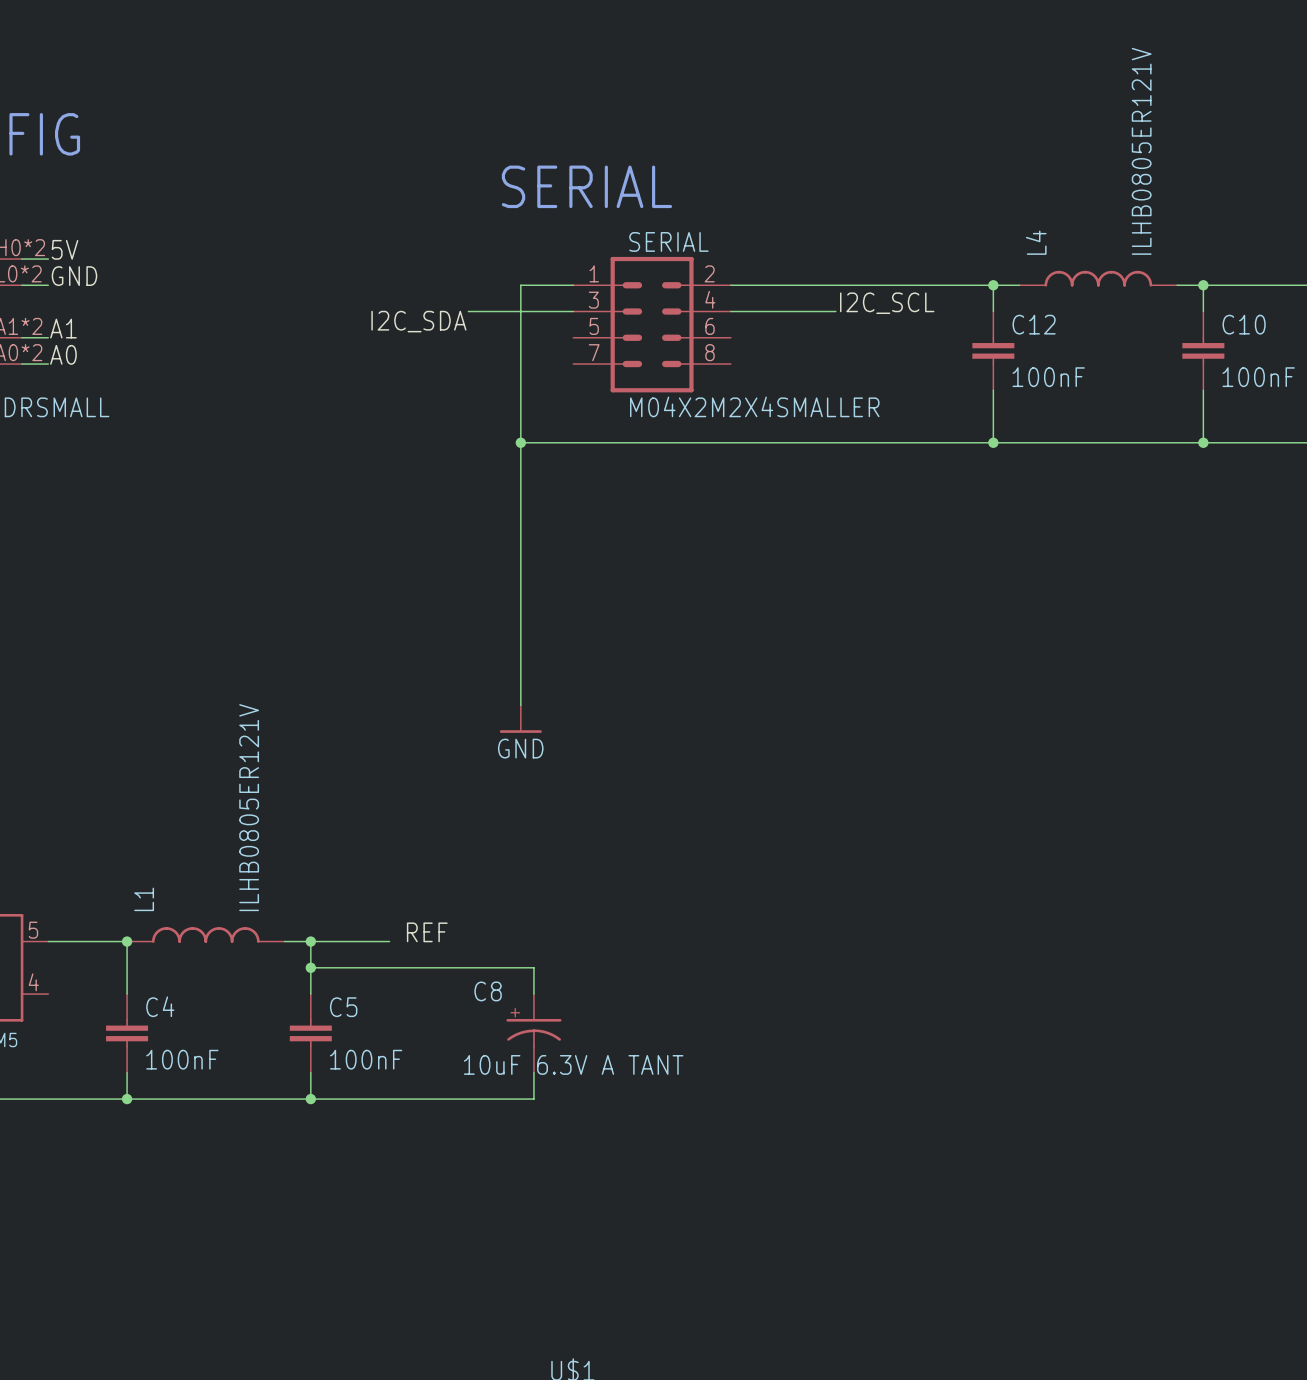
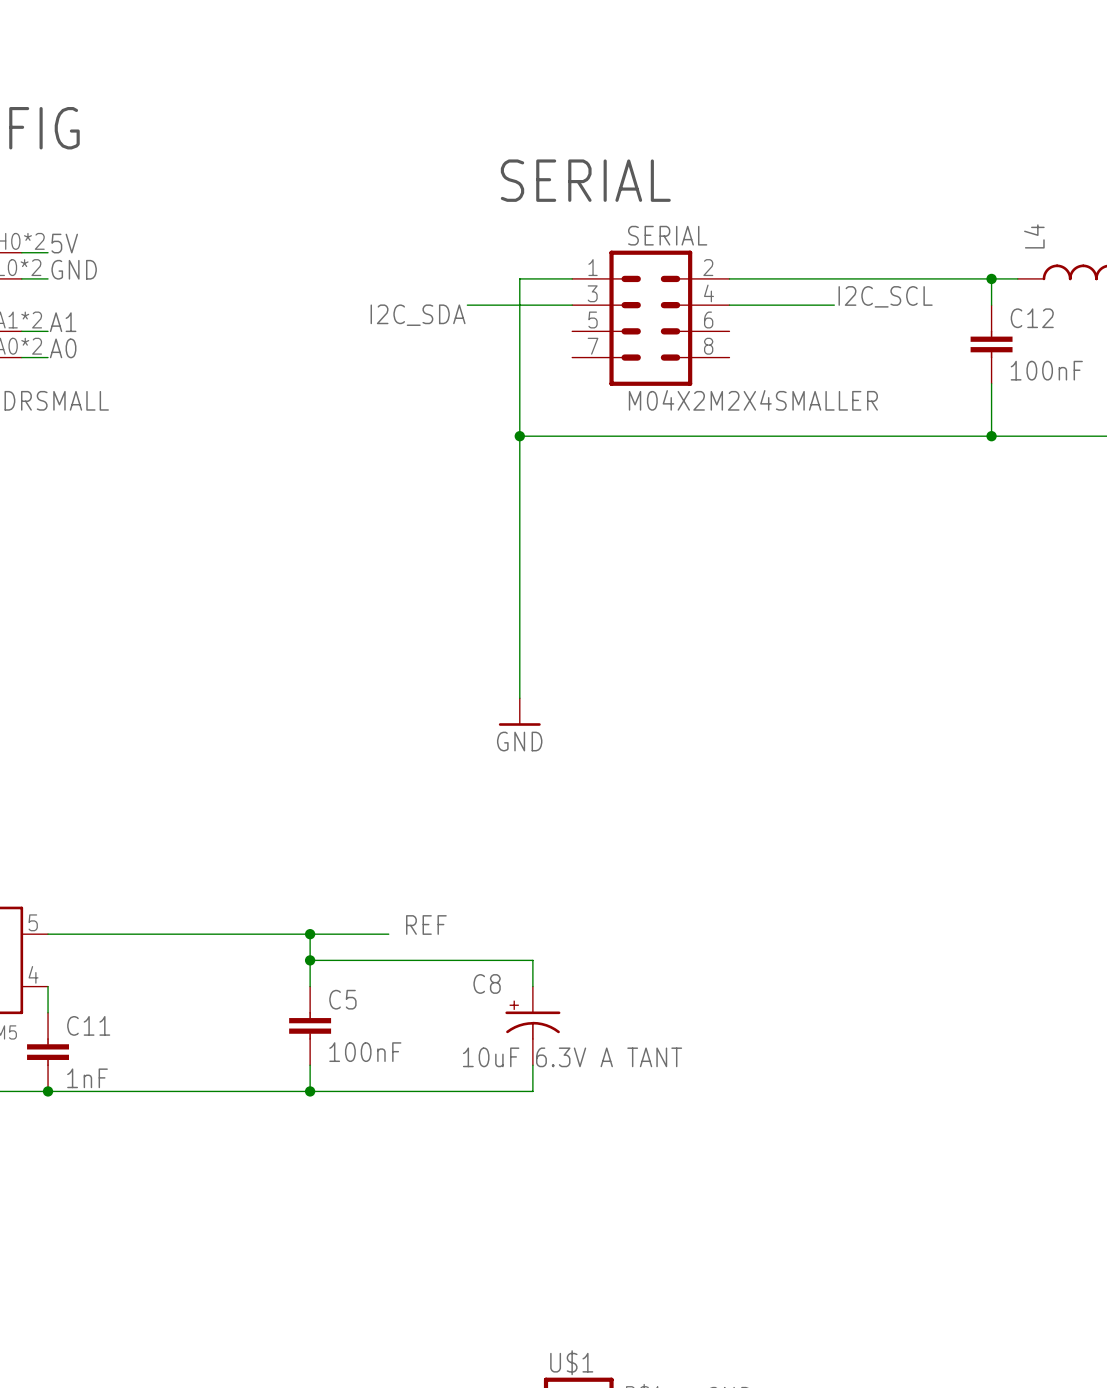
L1: ILHB0805ER121V (205, 934) -> none
wire: (127, 941) (127, 994) -> (126, 934) (283, 934)
junction: (127, 941) -> none
C4: 100nF (127, 1033) -> none
C11: none -> 1nF (48, 1052)
wire: (127, 1072) (127, 1099) -> (48, 986) (48, 1012)
junction: none -> (48, 1091)
junction: (127, 1099) -> none

